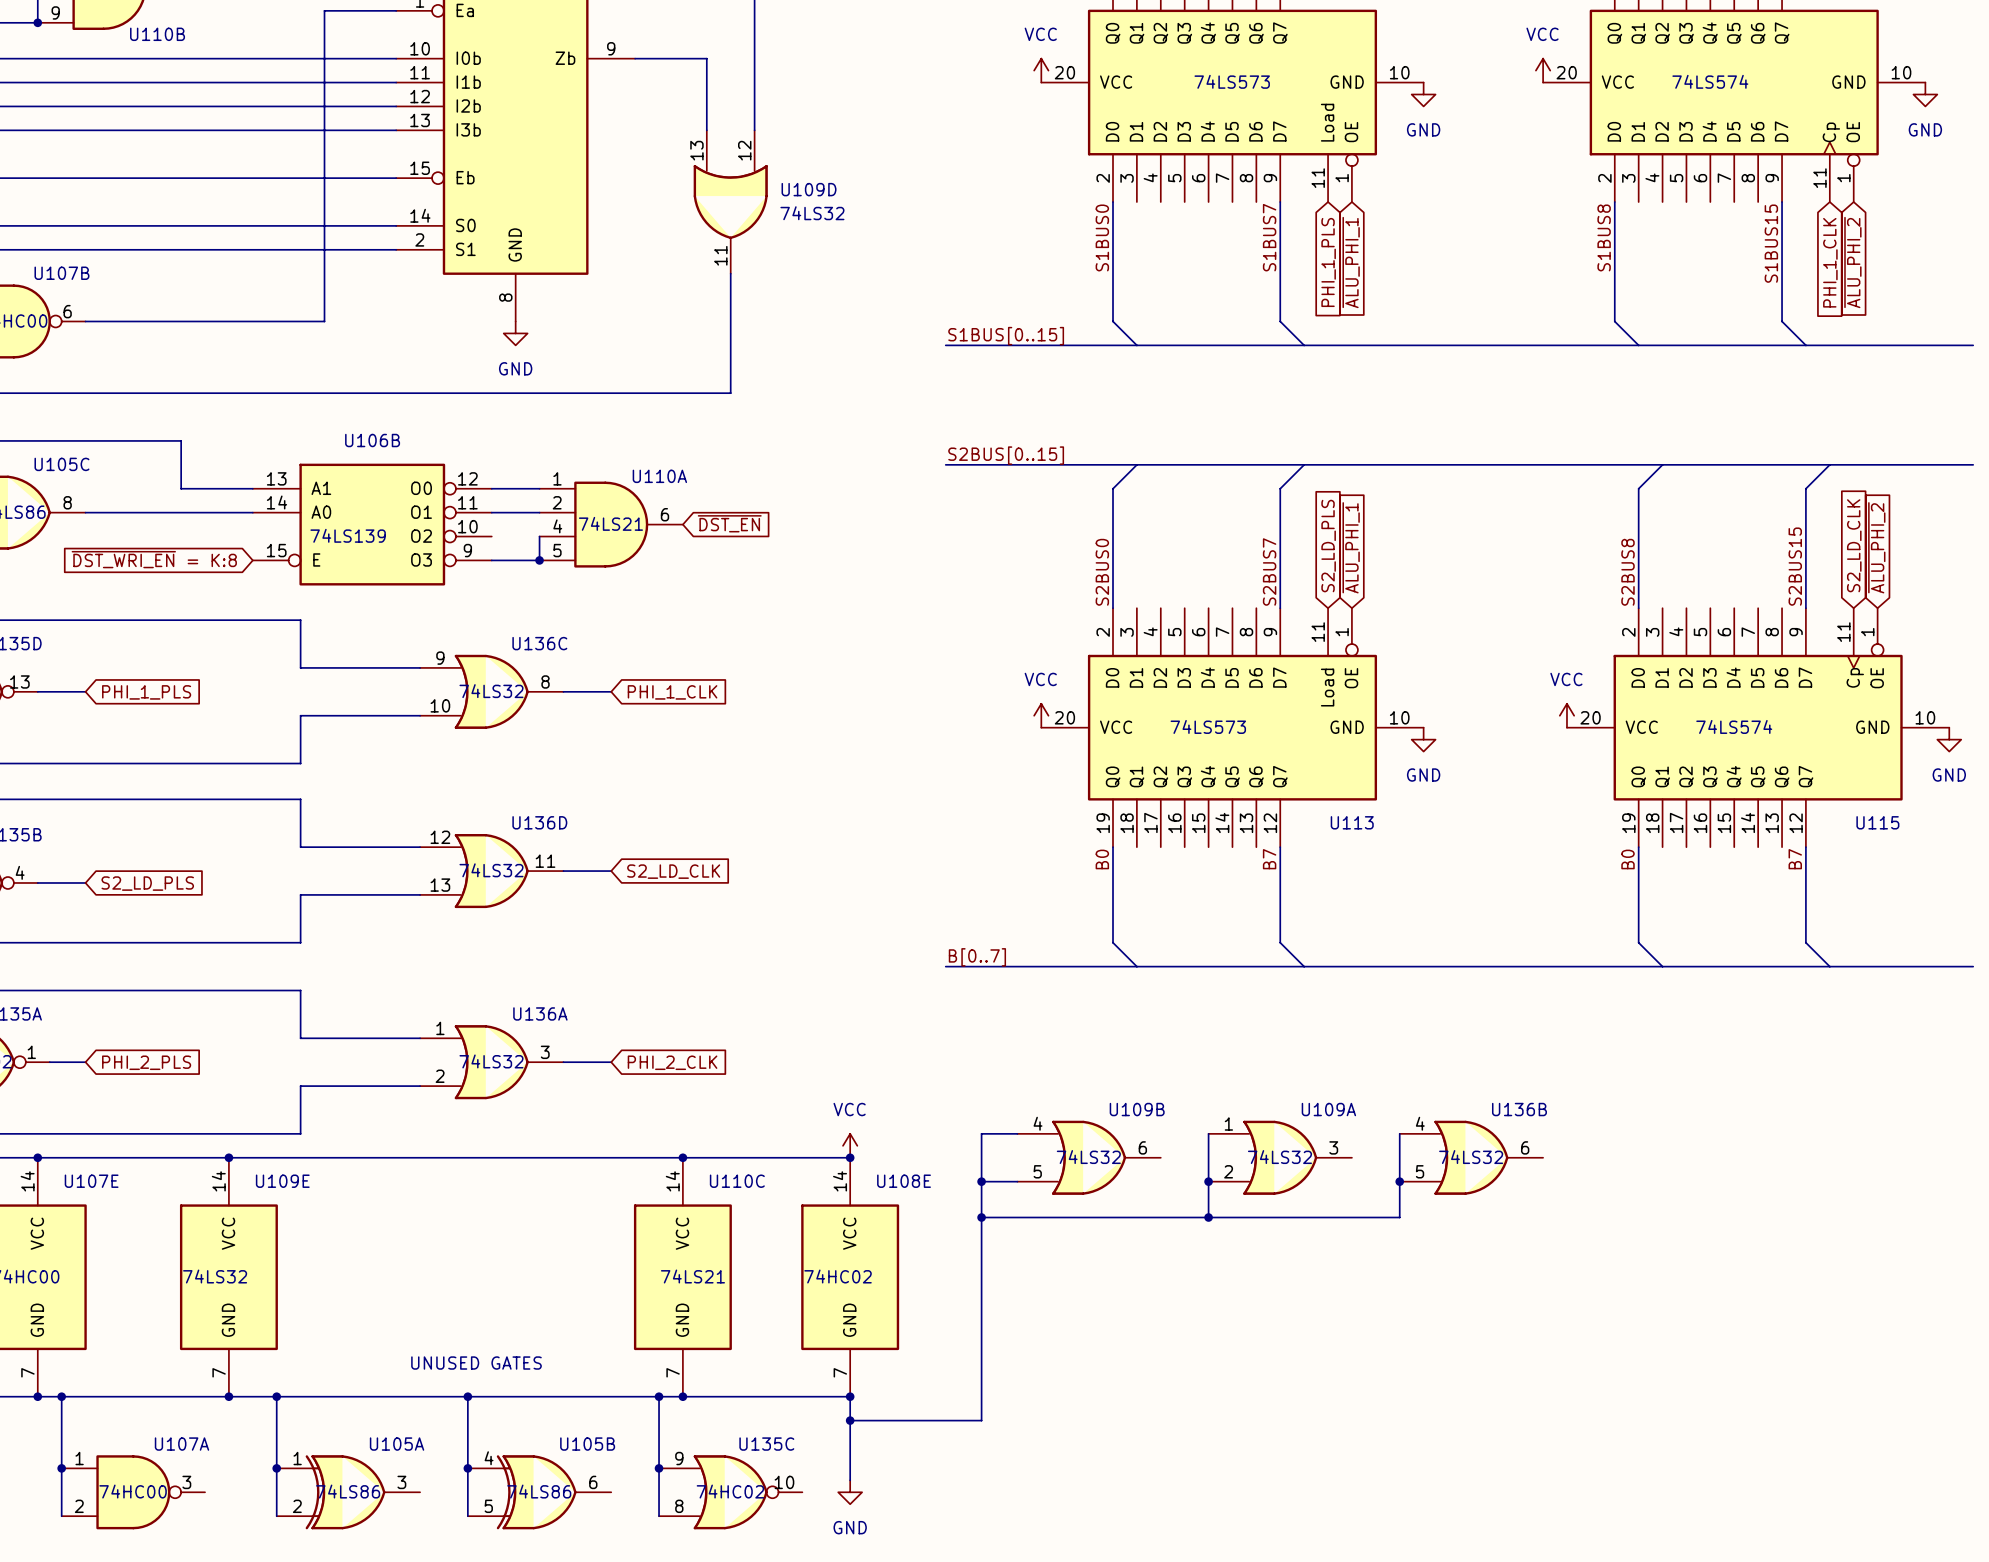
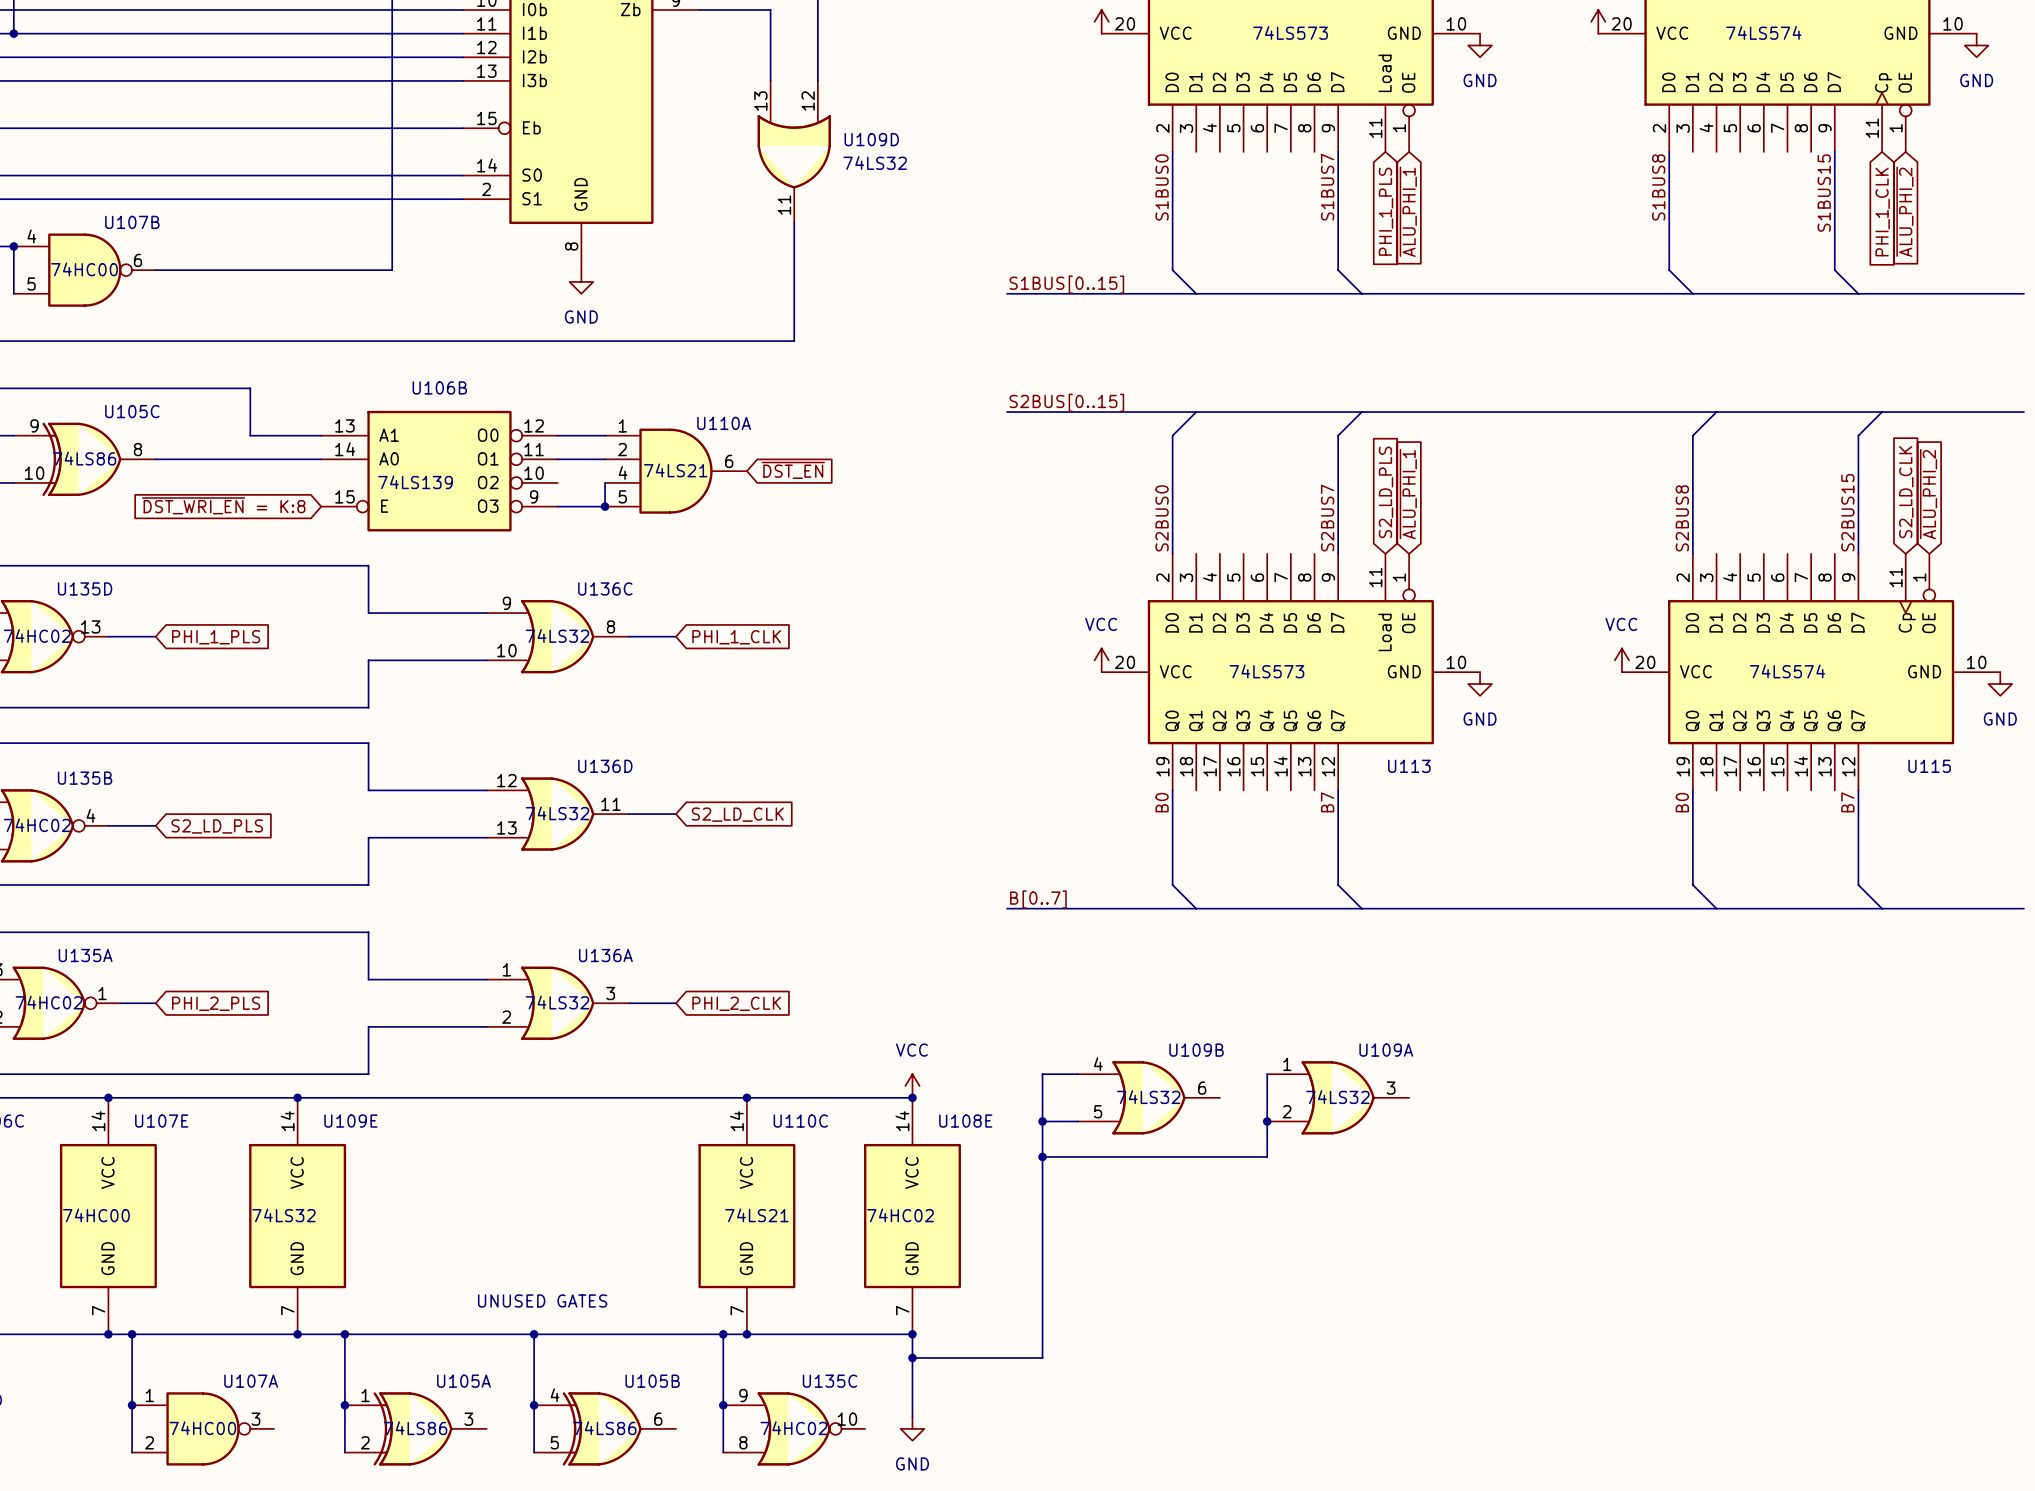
wire: (1399, 1133) (1399, 1217) (1208, 1217) -> none
U136B: 74LS32 (1471, 1157) -> none
junction: (1399, 1181) -> none
junction: (1208, 1217) -> none

